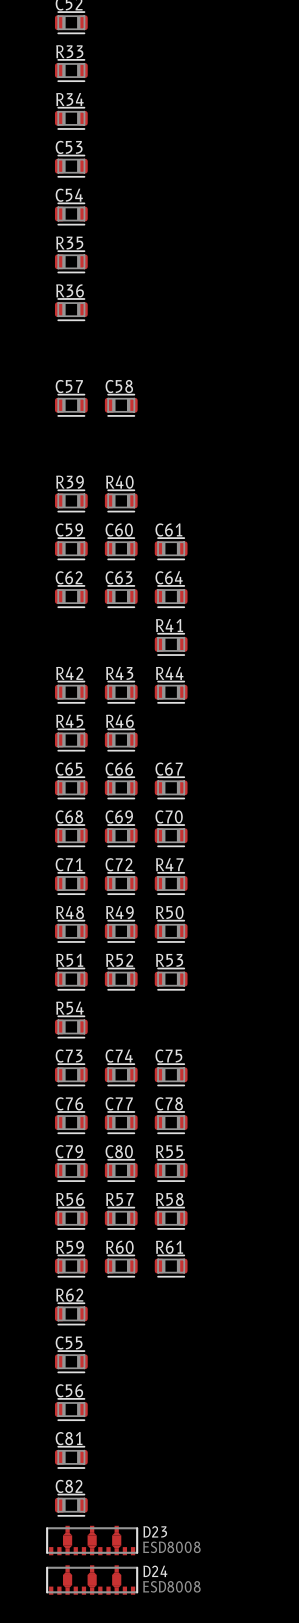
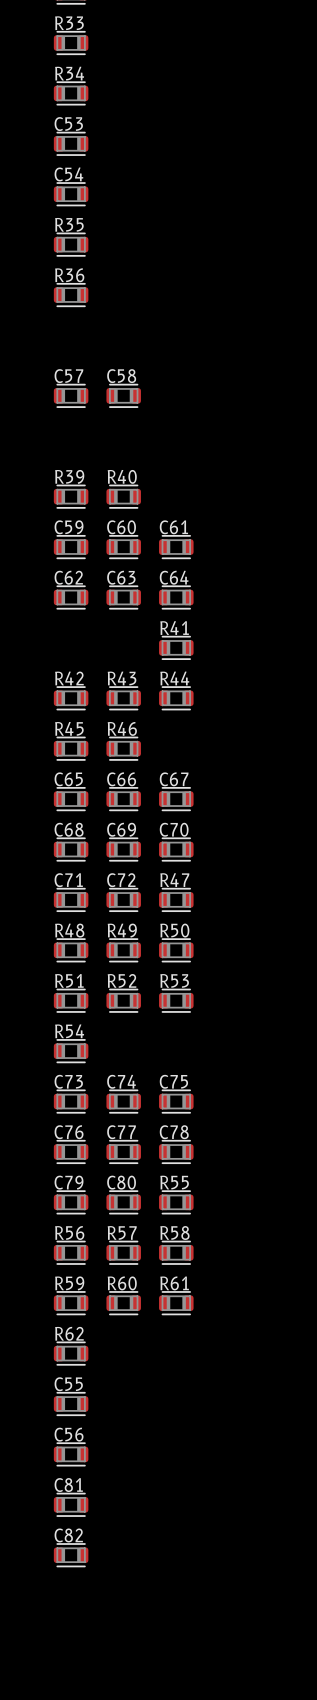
D23: ESD8008 (92, 1540) -> none
D24: ESD8008 (92, 1580) -> none

